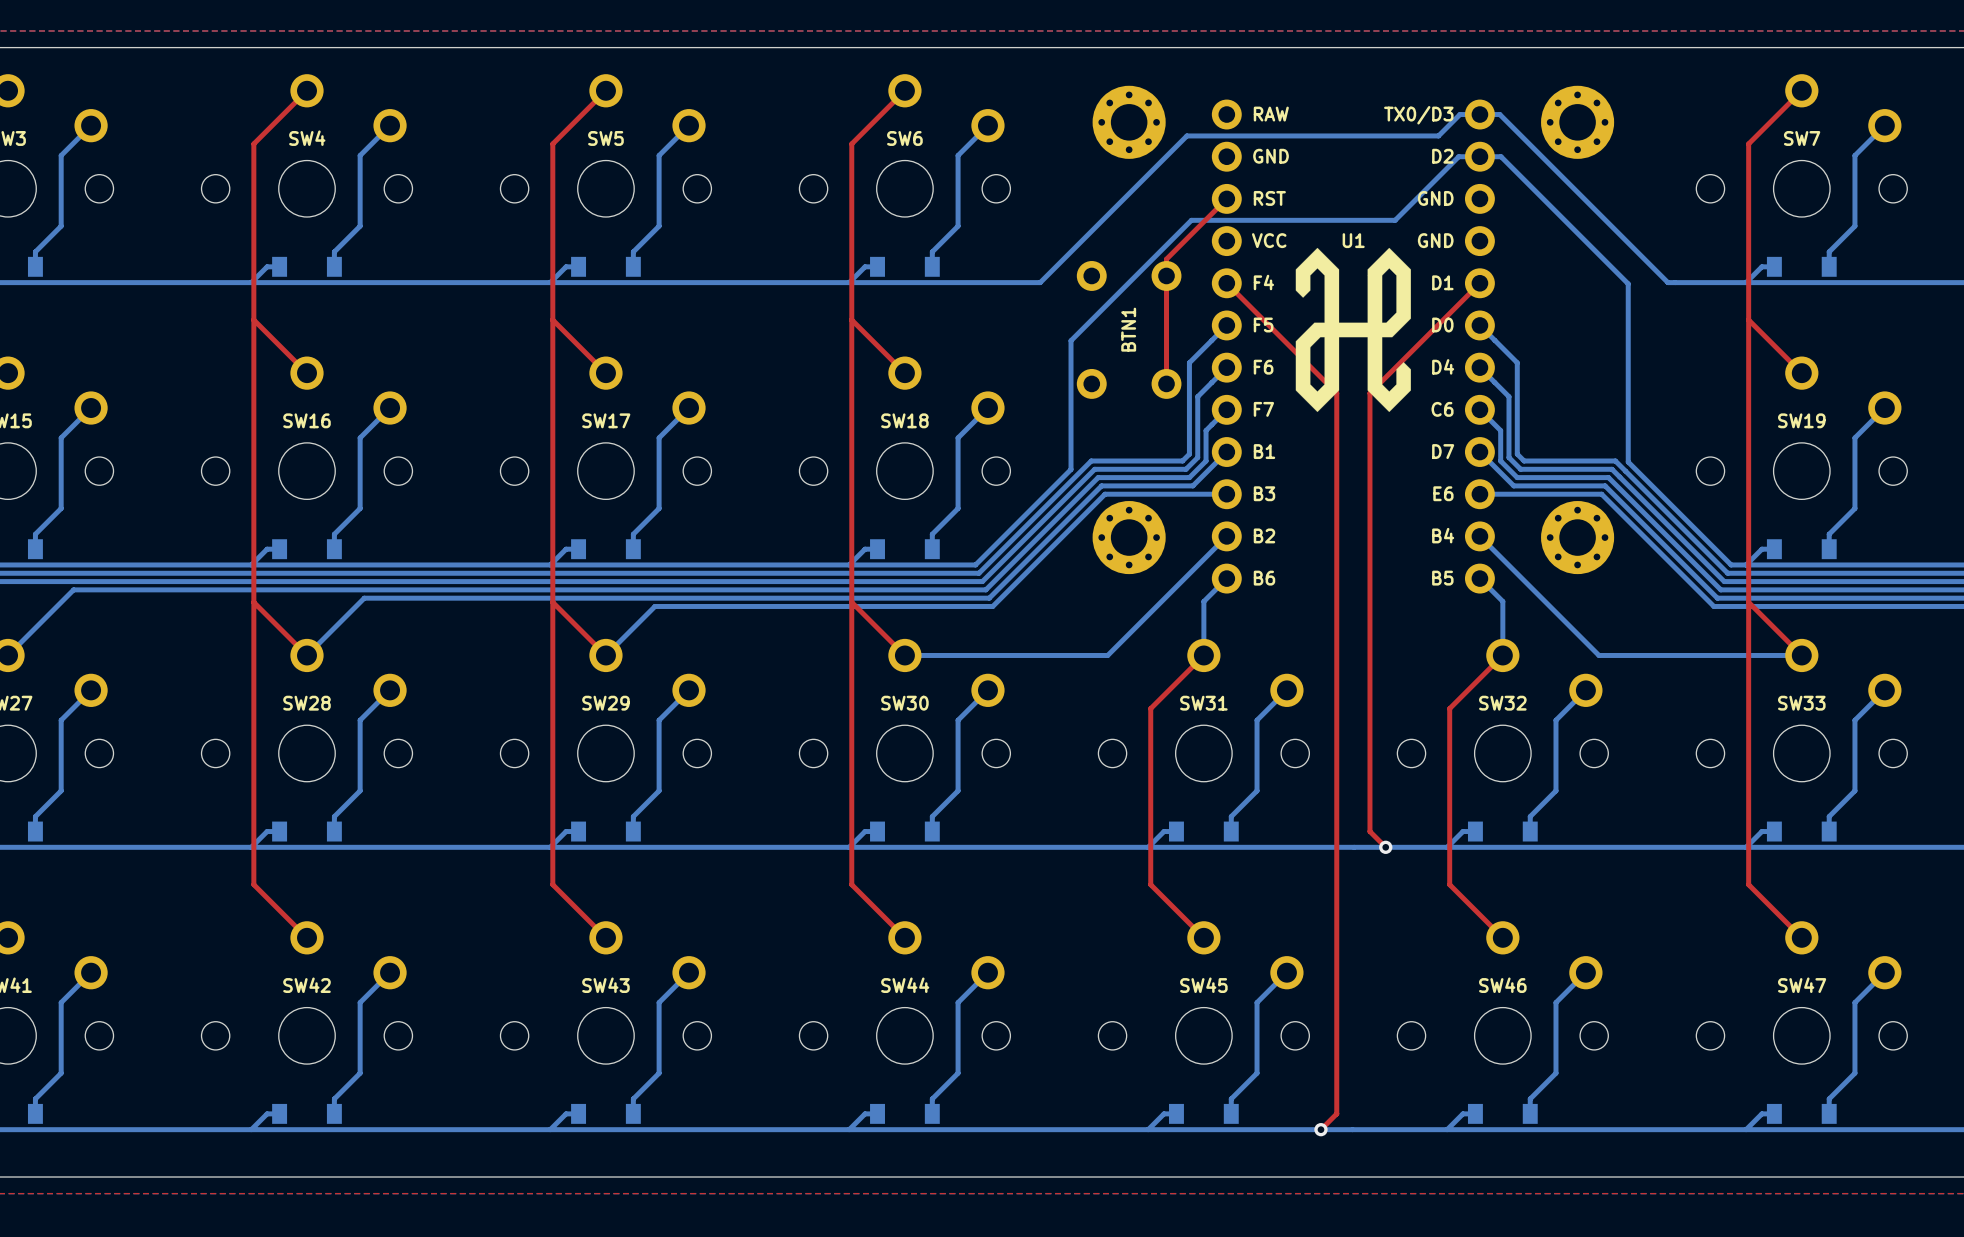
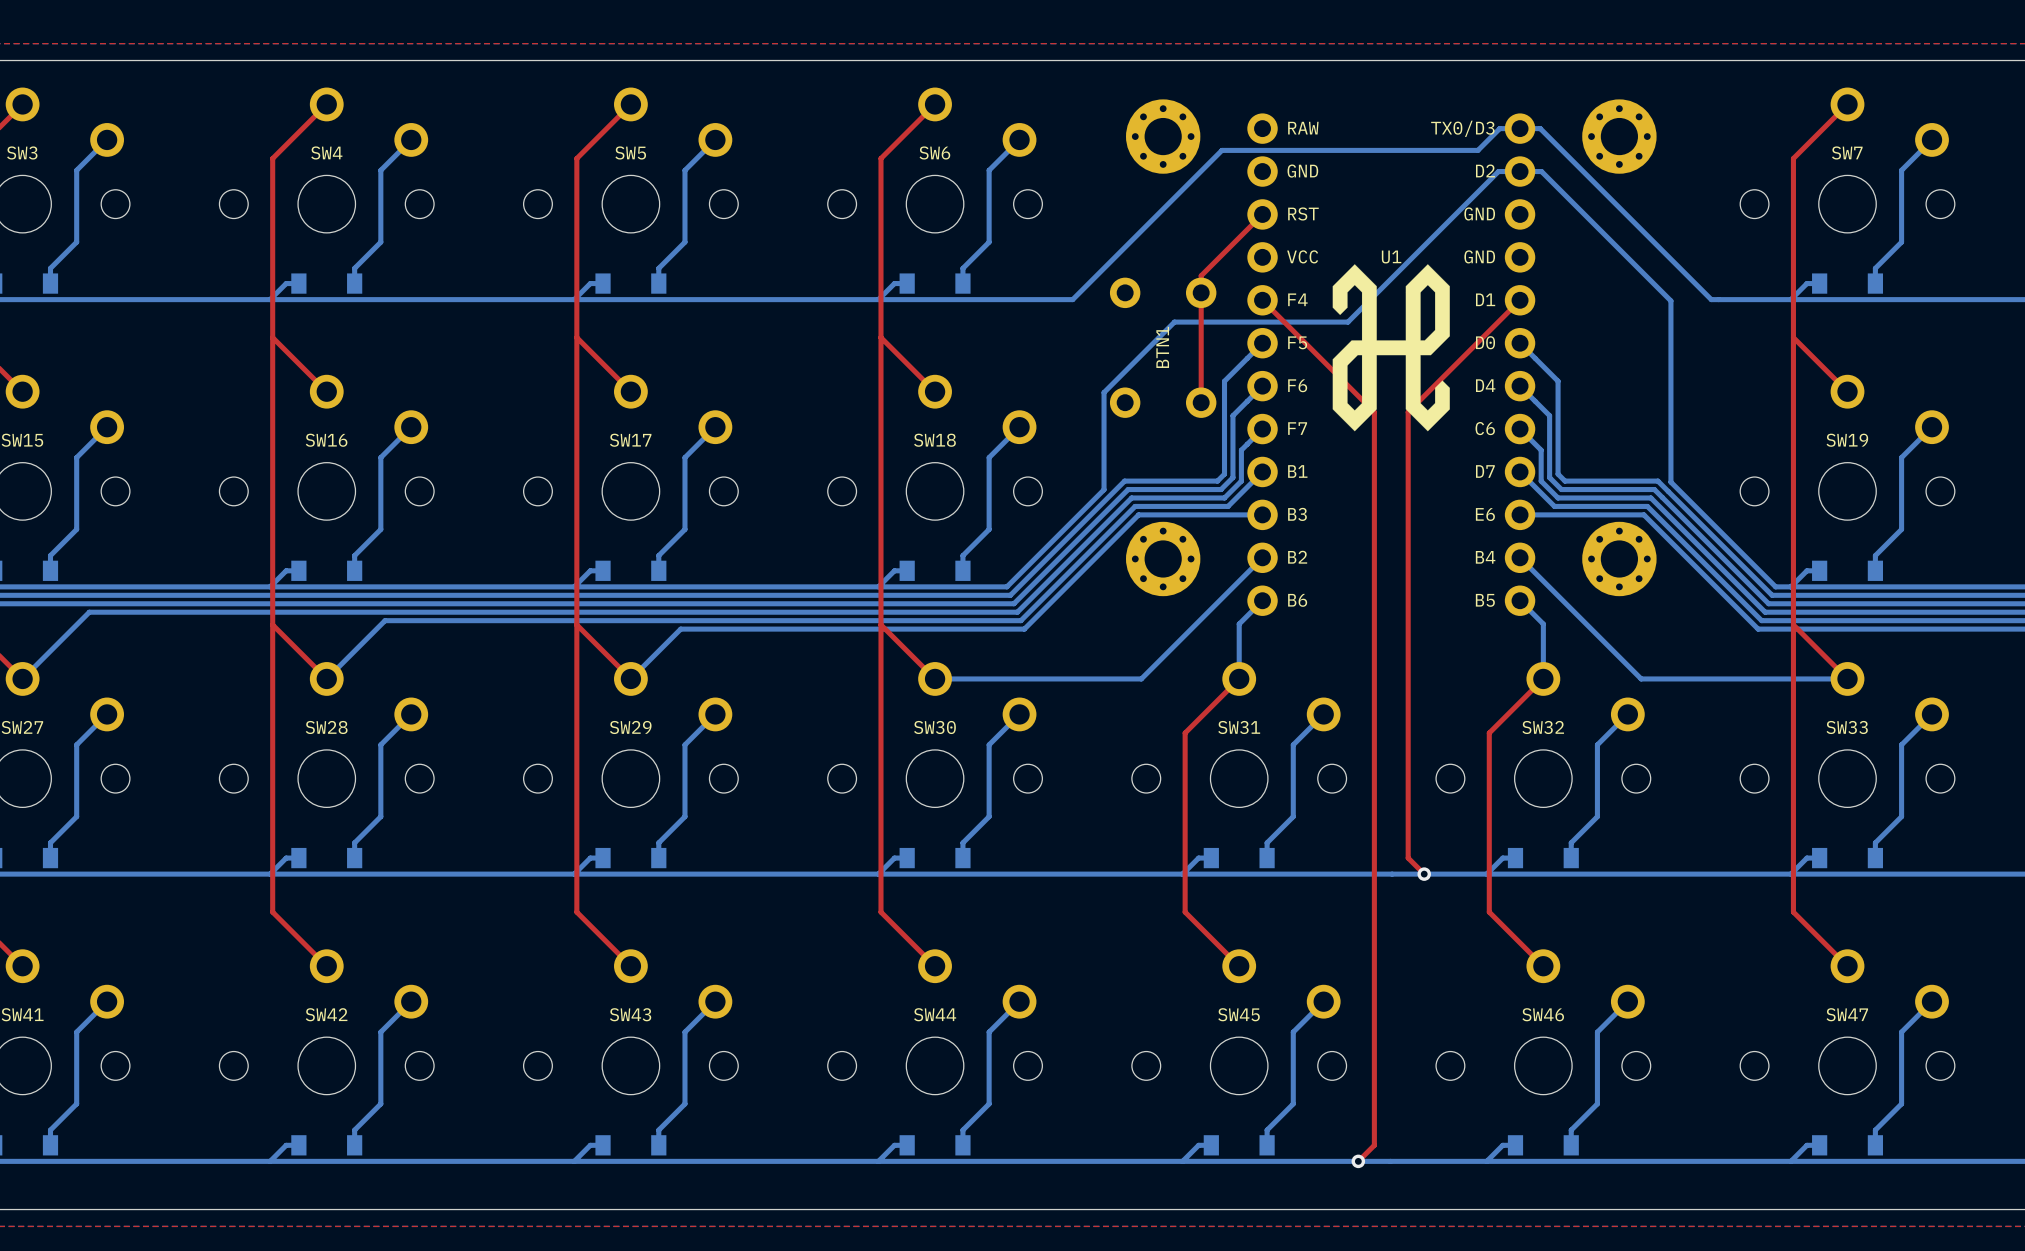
bottom track: (1395, 220) (1191, 220) (1071, 340) (1071, 373) -> (1433, 236) (1347, 322) (1174, 322) (1104, 392)

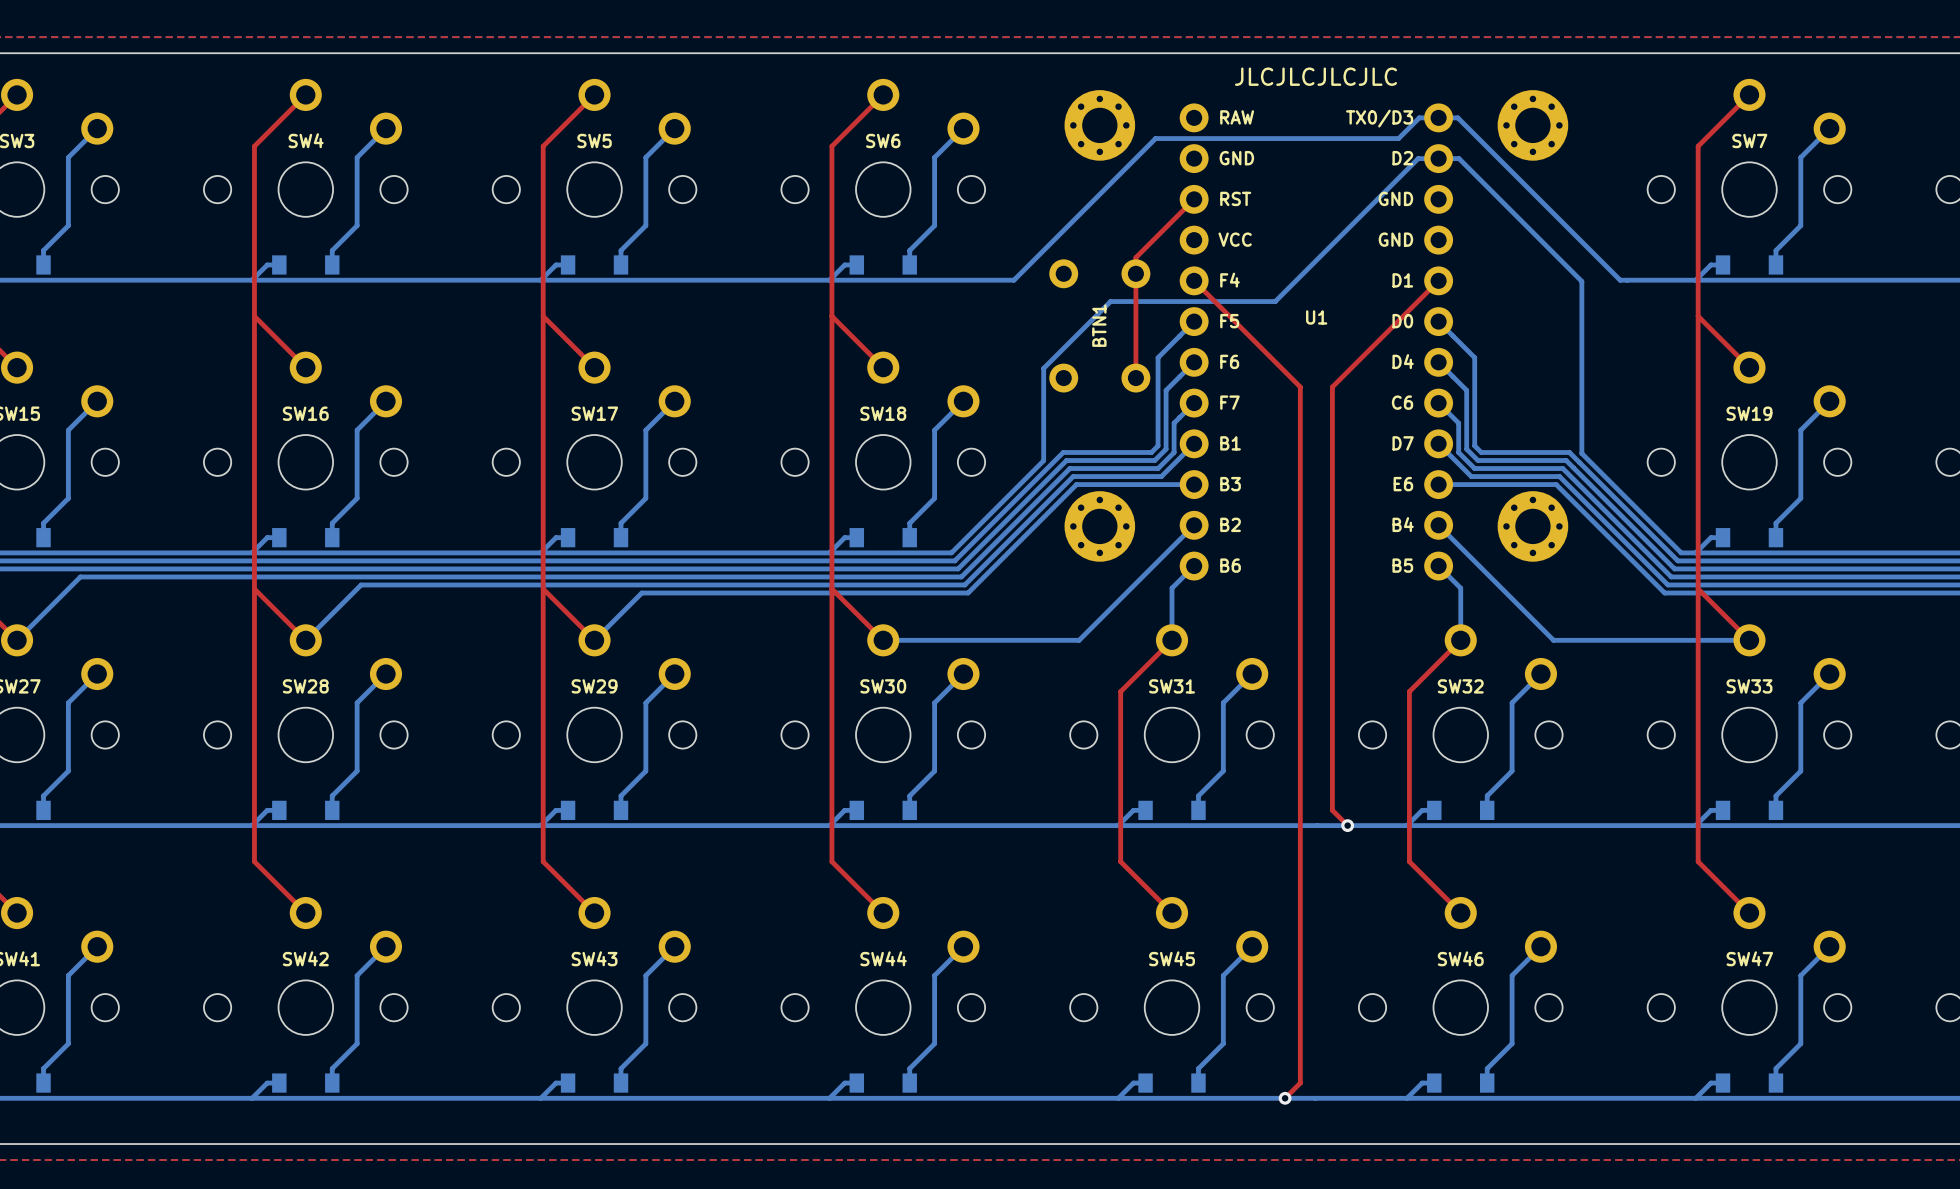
text: none -> JLCJLCJLCJLC (1316, 76)
U1 name position: U1 (1391, 257) -> U1 (1316, 317)
drawing: [1332, 264, 1450, 432] -> none

